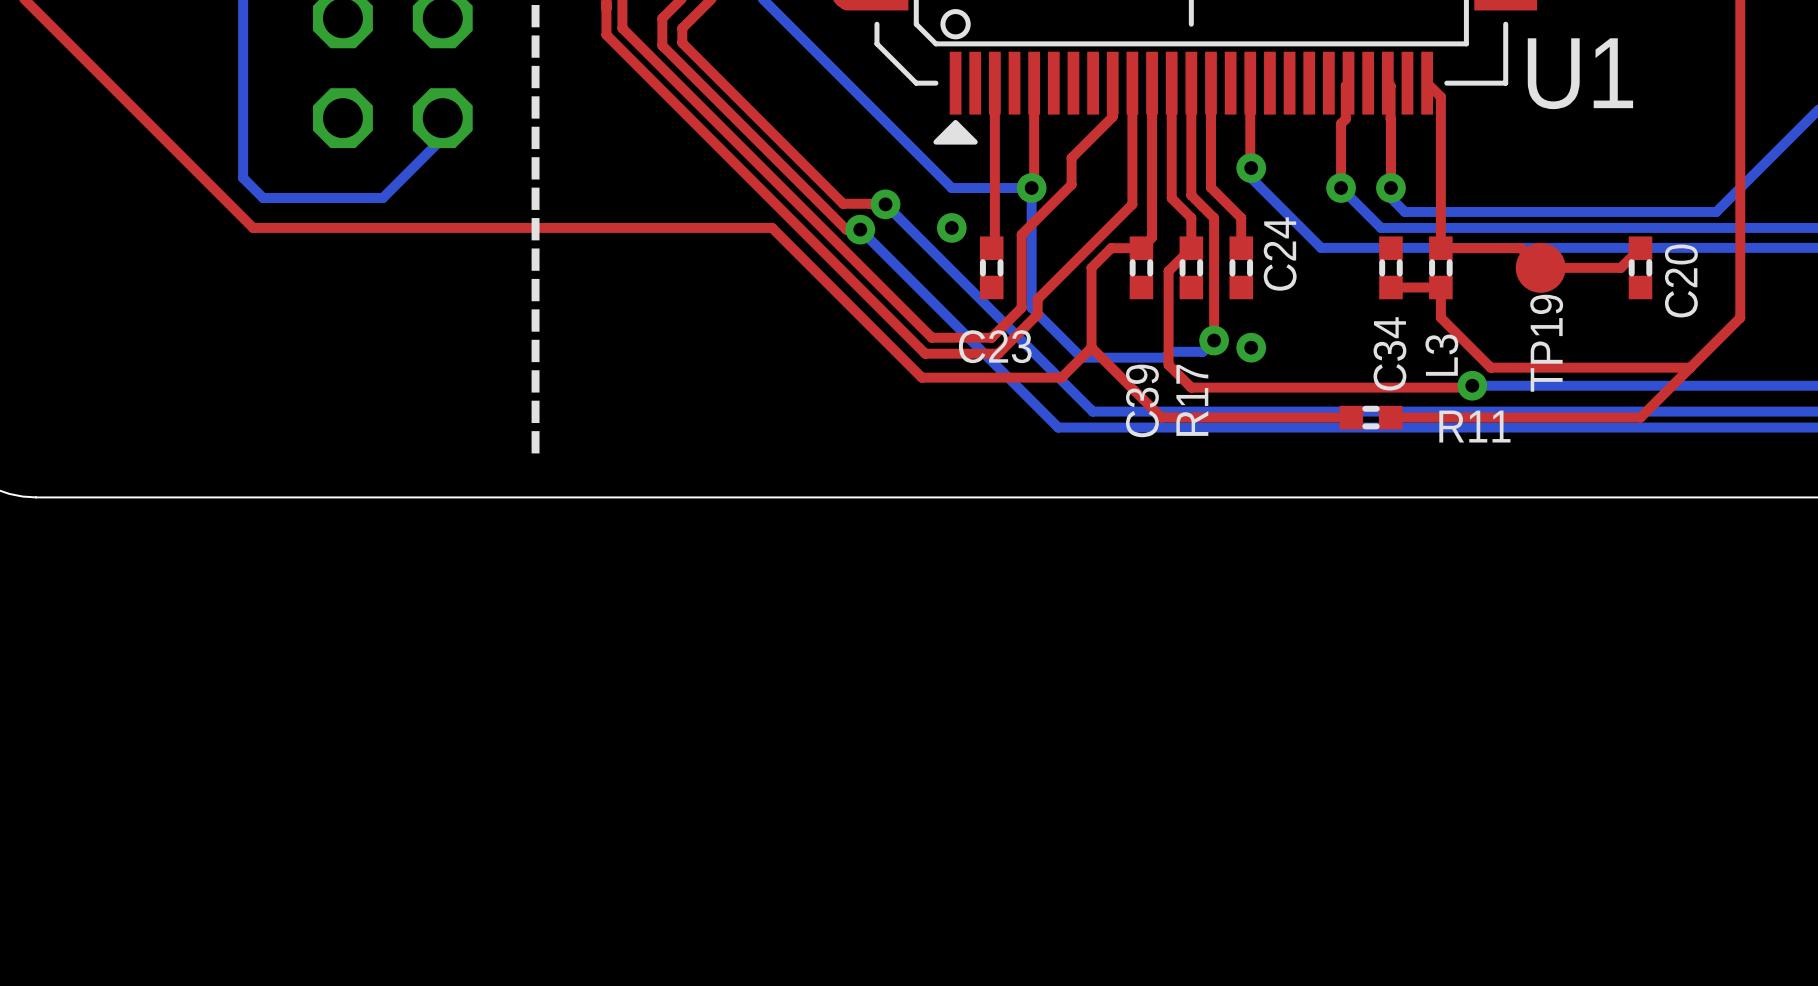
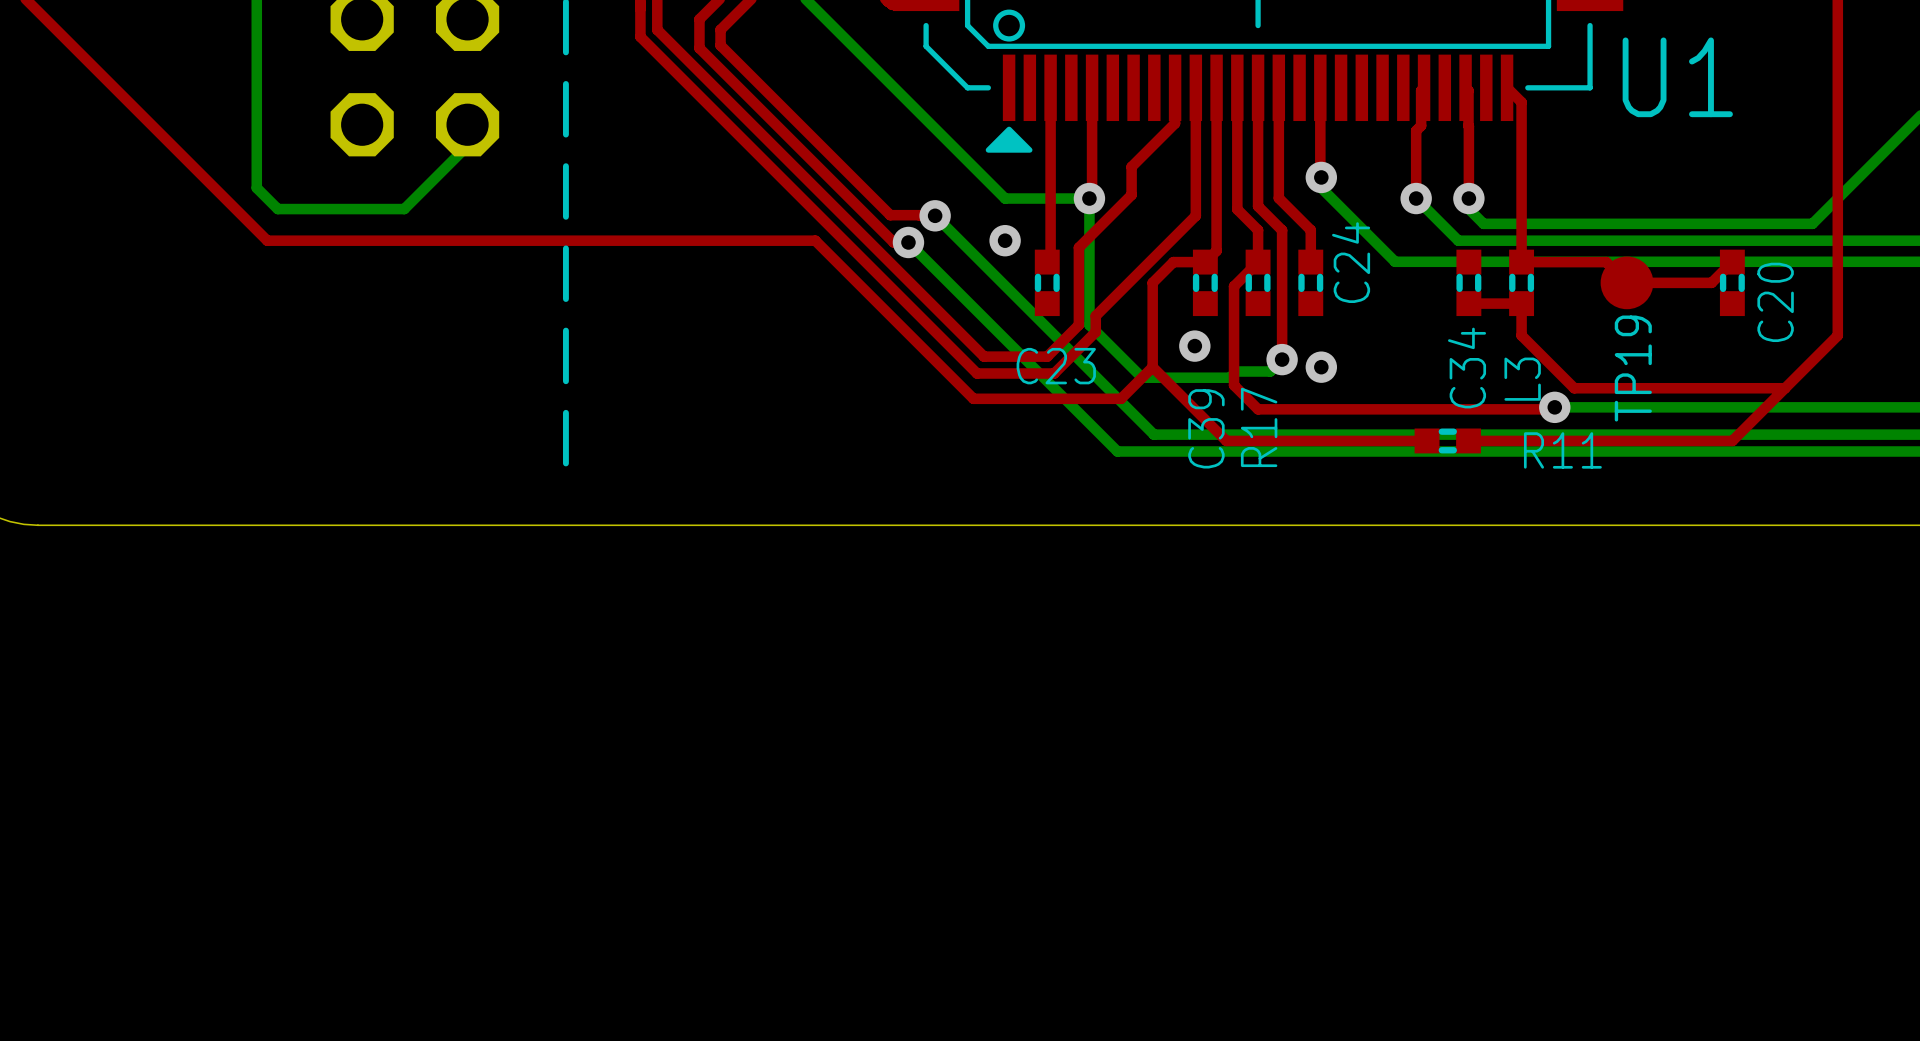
via: none -> (1194, 346)

